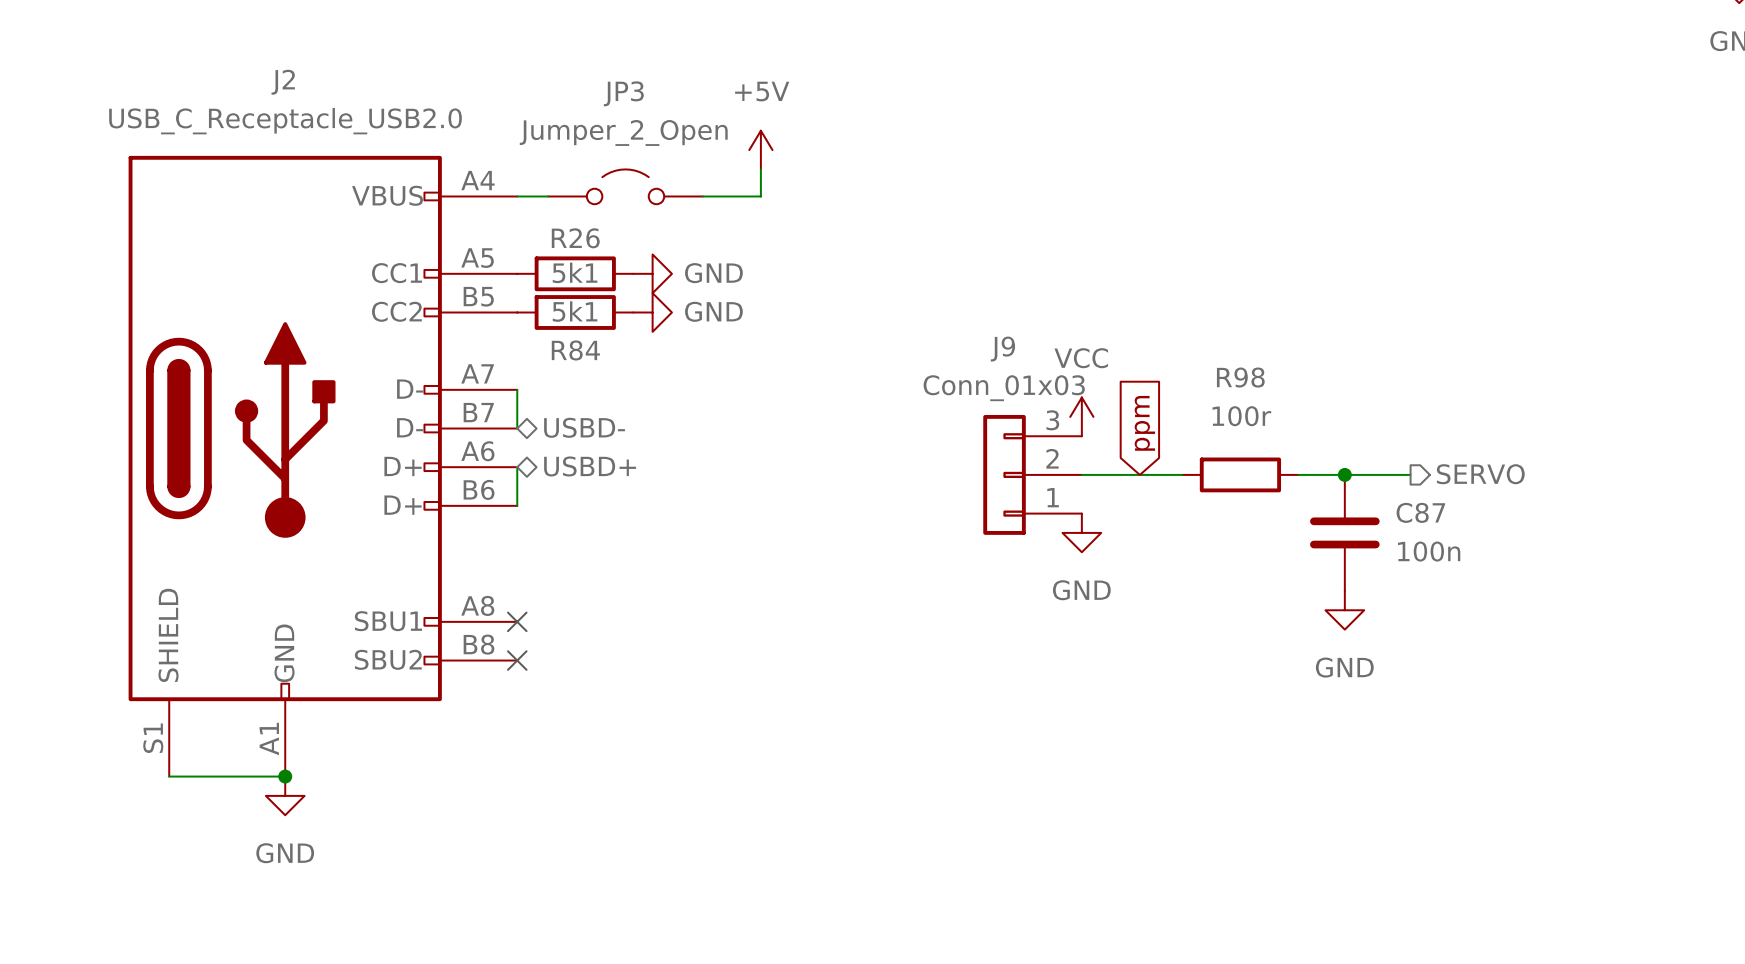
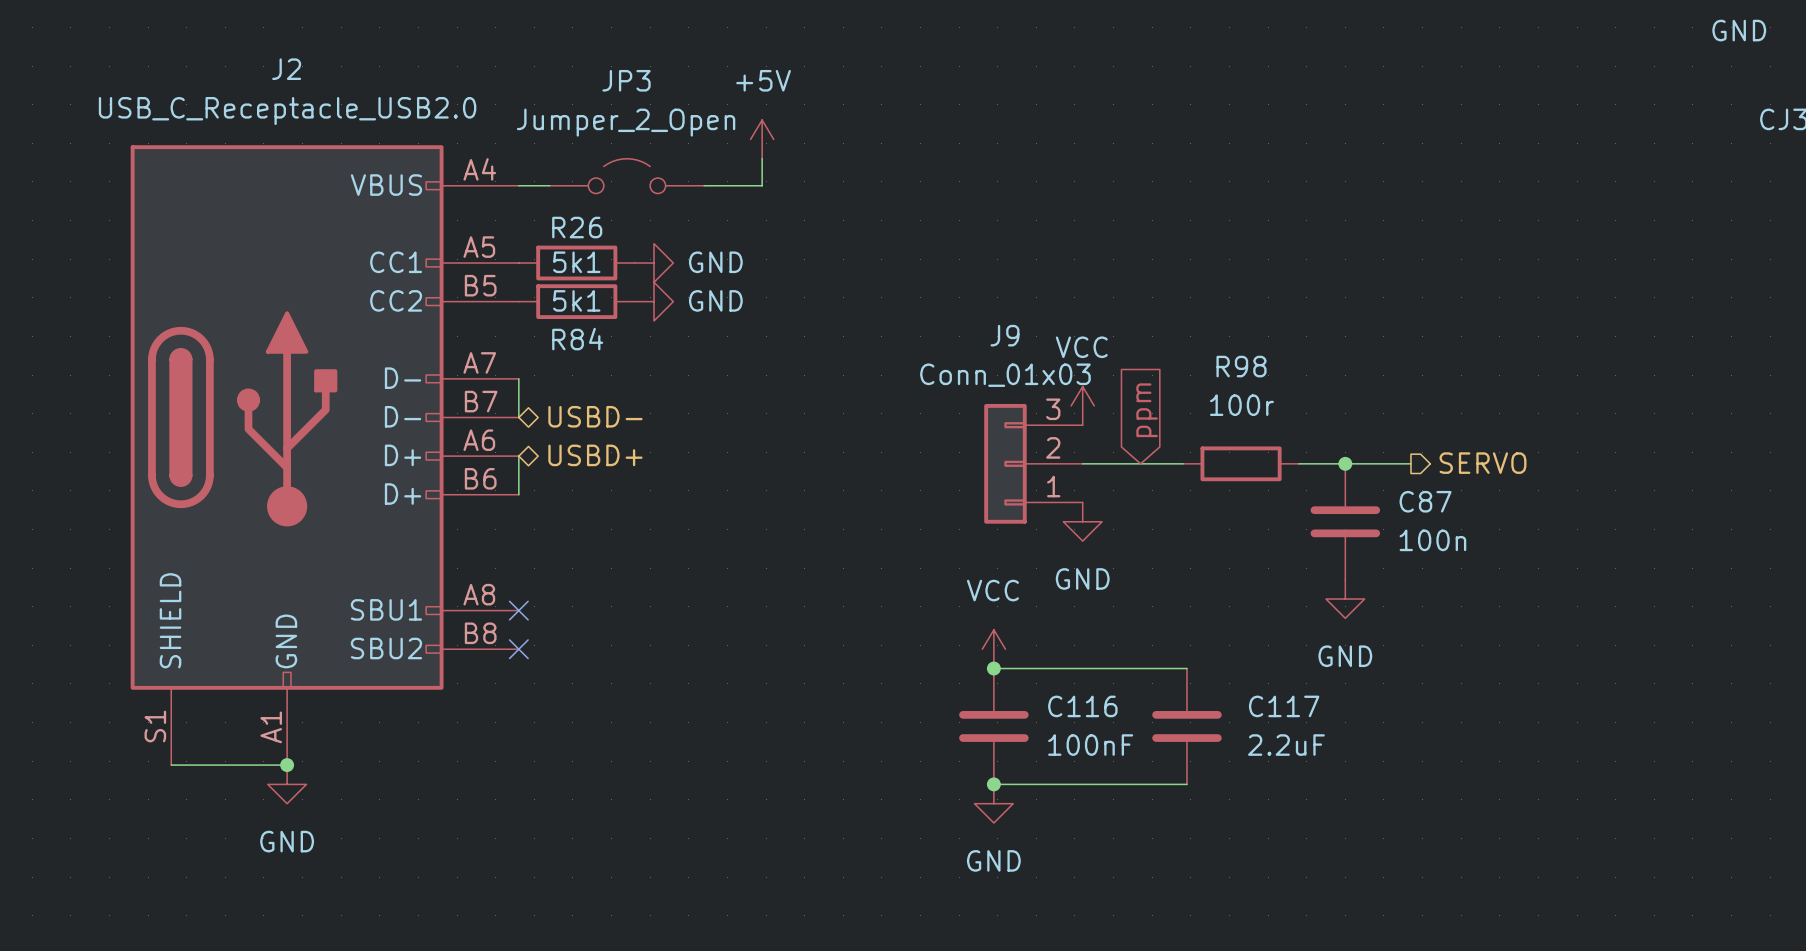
power symbol: none -> VCC (993, 649)
wire: none -> (993, 668) (1186, 668)
junction: none -> (993, 668)
C116: none -> 100nF (993, 726)
C117: none -> 2.2uF (1186, 726)
wire: none -> (993, 784) (1186, 784)
junction: none -> (993, 784)
power symbol: none -> GND (993, 803)

